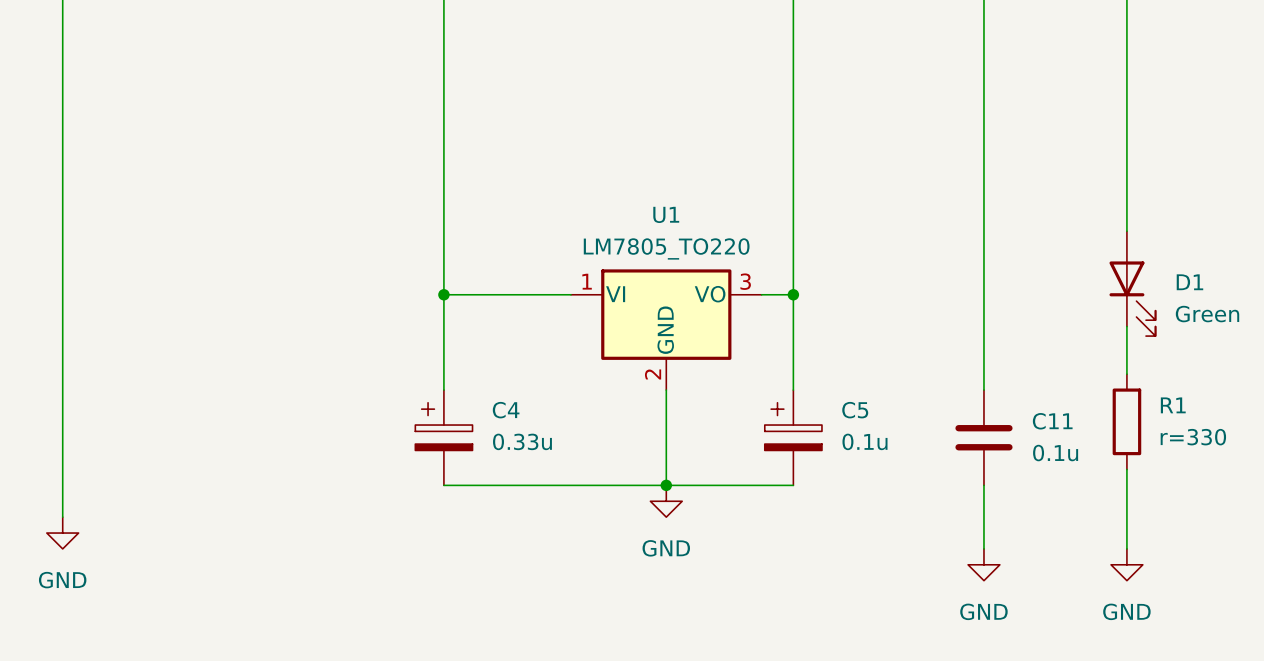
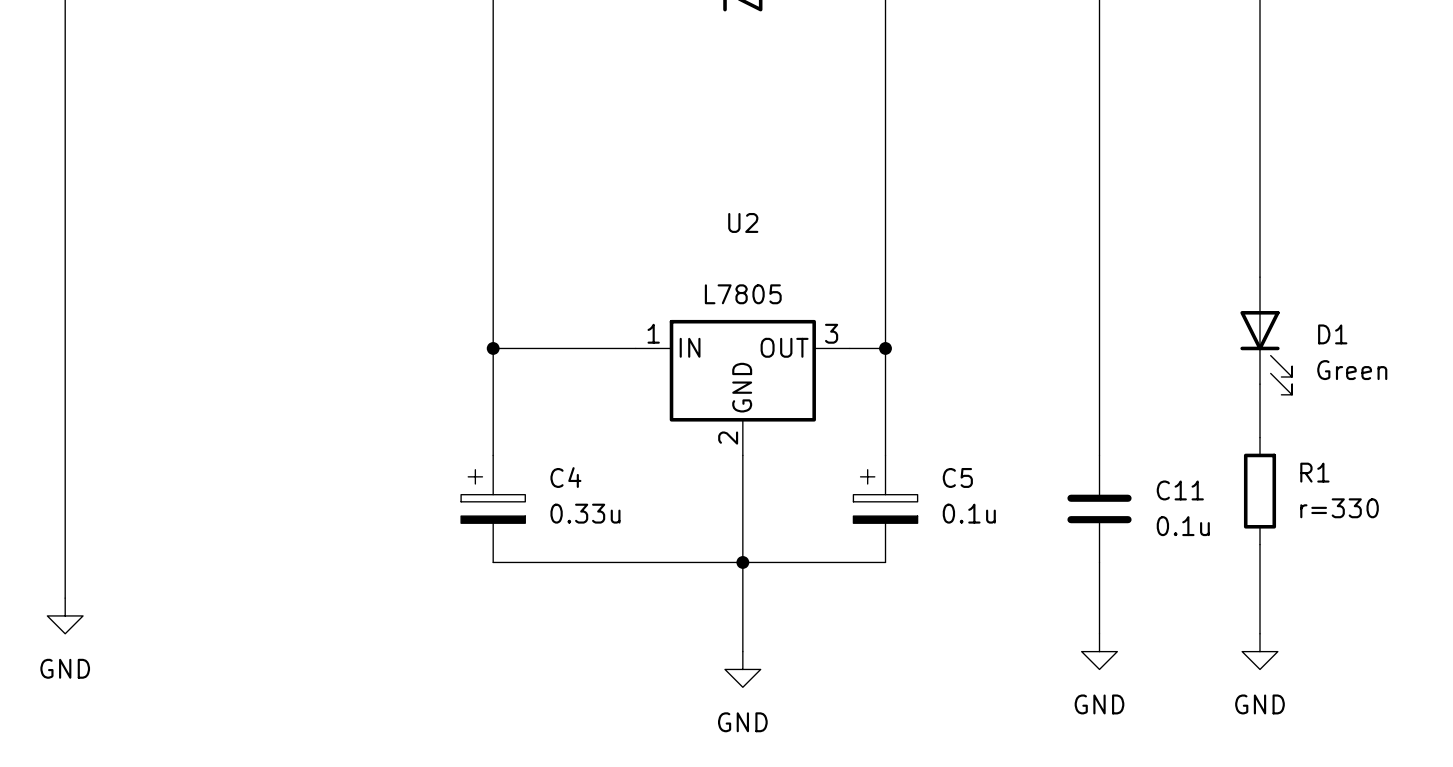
U1 name: U1 (666, 214) -> U2 (743, 222)
U1 value: LM7805_TO220 (666, 248) -> L7805 (743, 294)
U1 pin name: VI (615, 294) -> IN (690, 347)
U1 pin name: VO (710, 294) -> OUT (784, 347)
wire: none -> (742, 562) (742, 651)
power symbol position: GND (666, 501) -> GND (742, 669)

